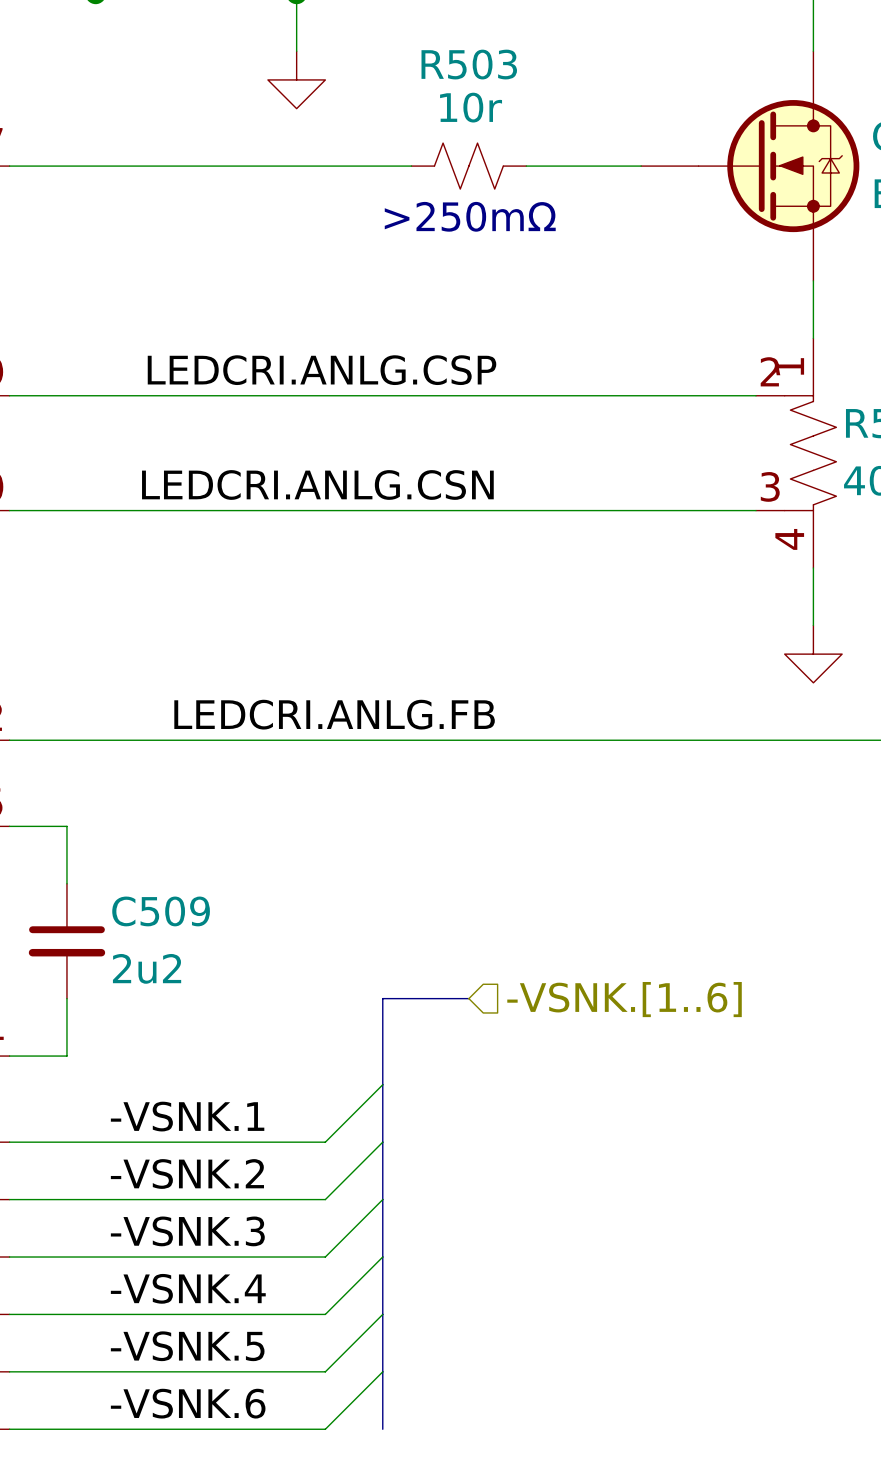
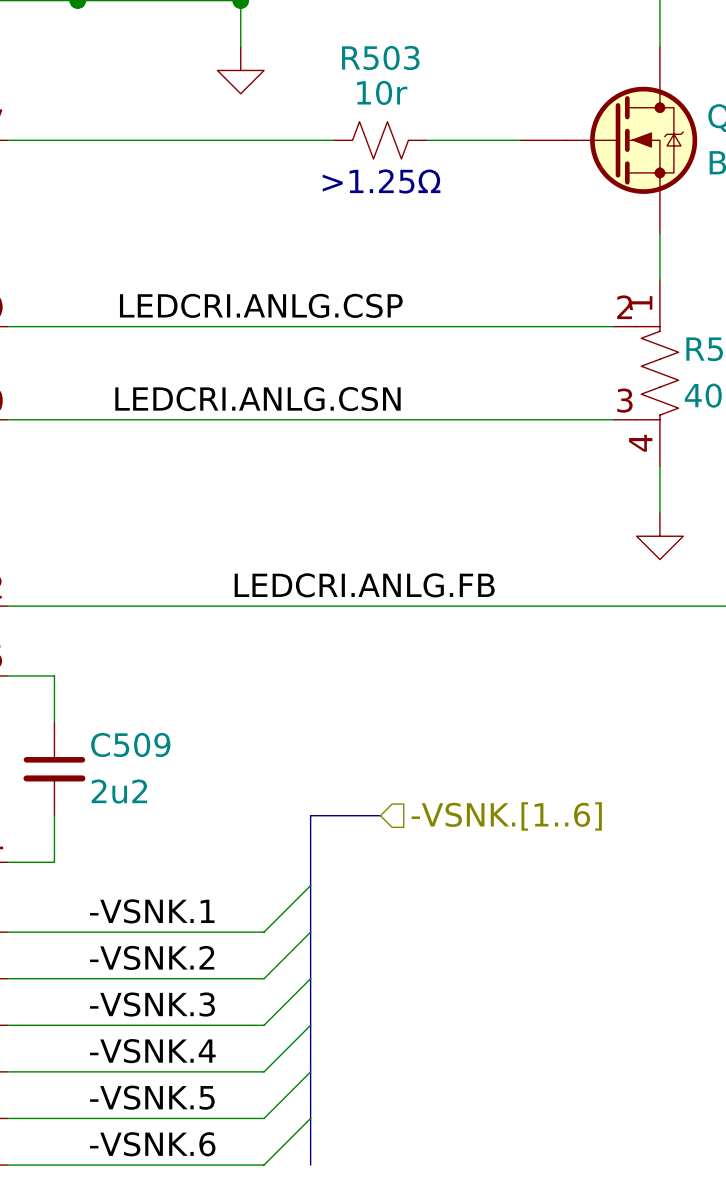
text: >250mΩ (470, 216) -> >1.25Ω (381, 181)
label position: LEDCRI.ANLG.FB (334, 714) -> LEDCRI.ANLG.FB (364, 585)

